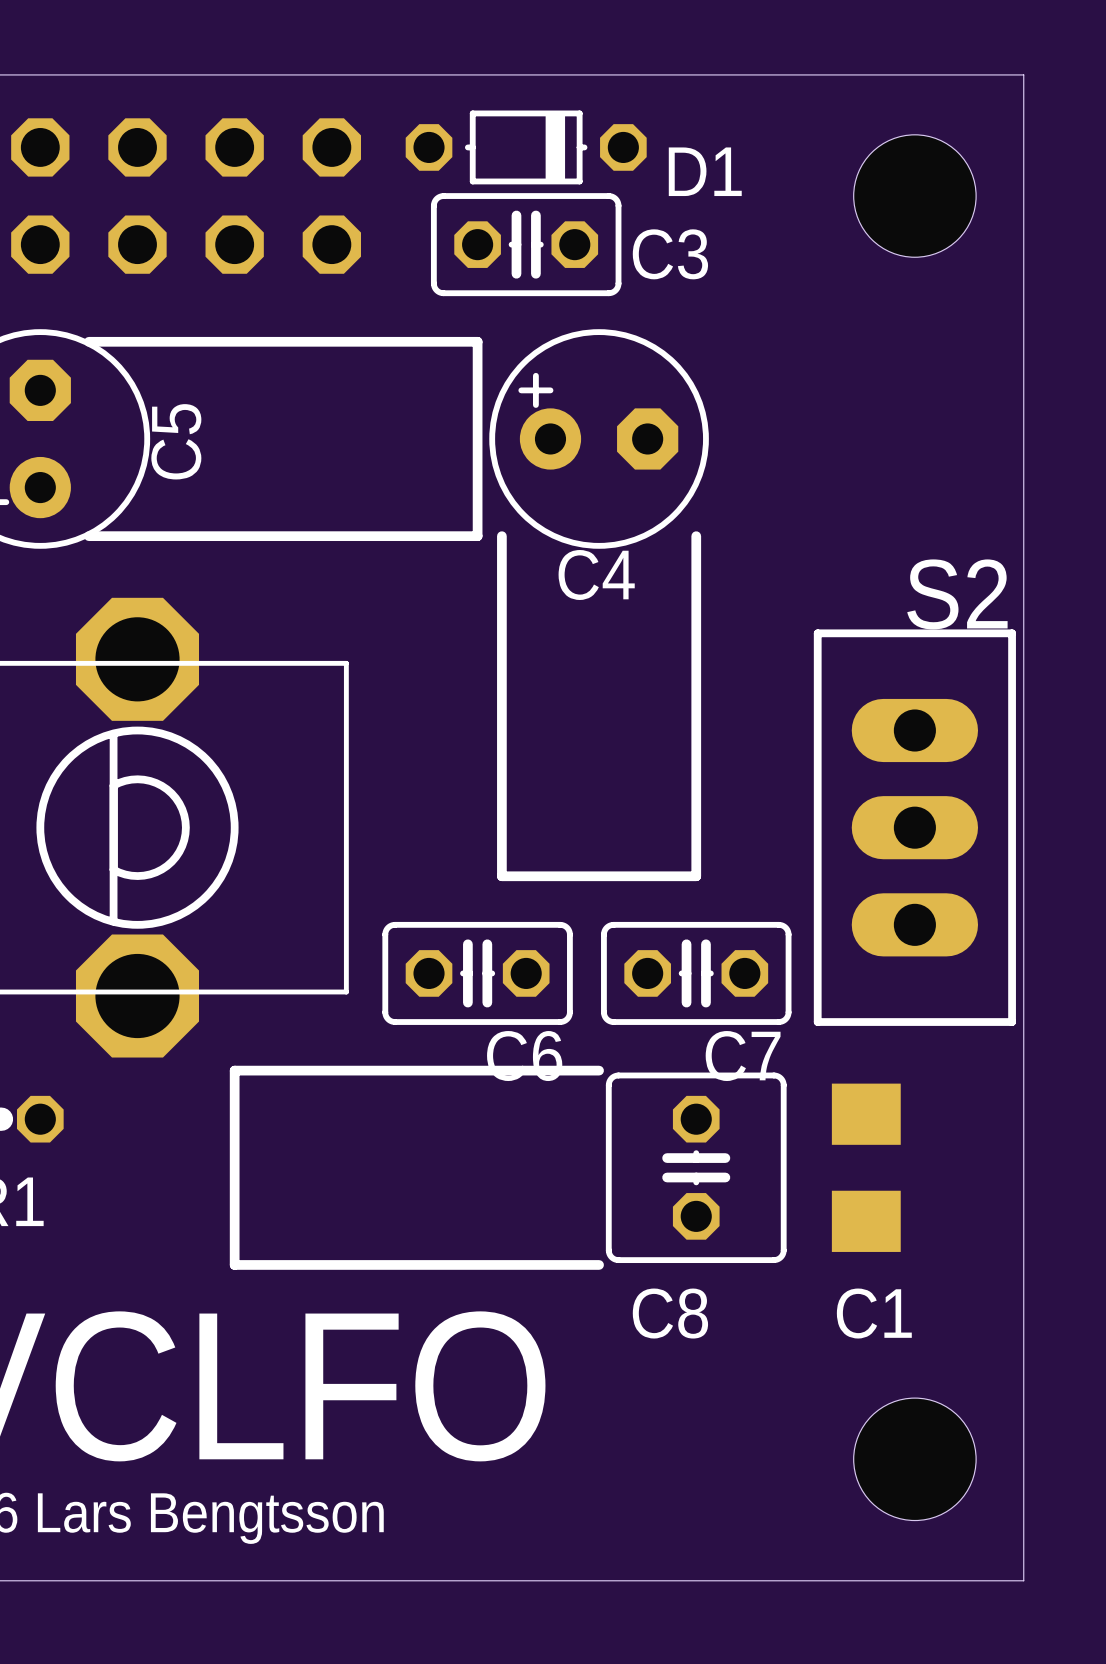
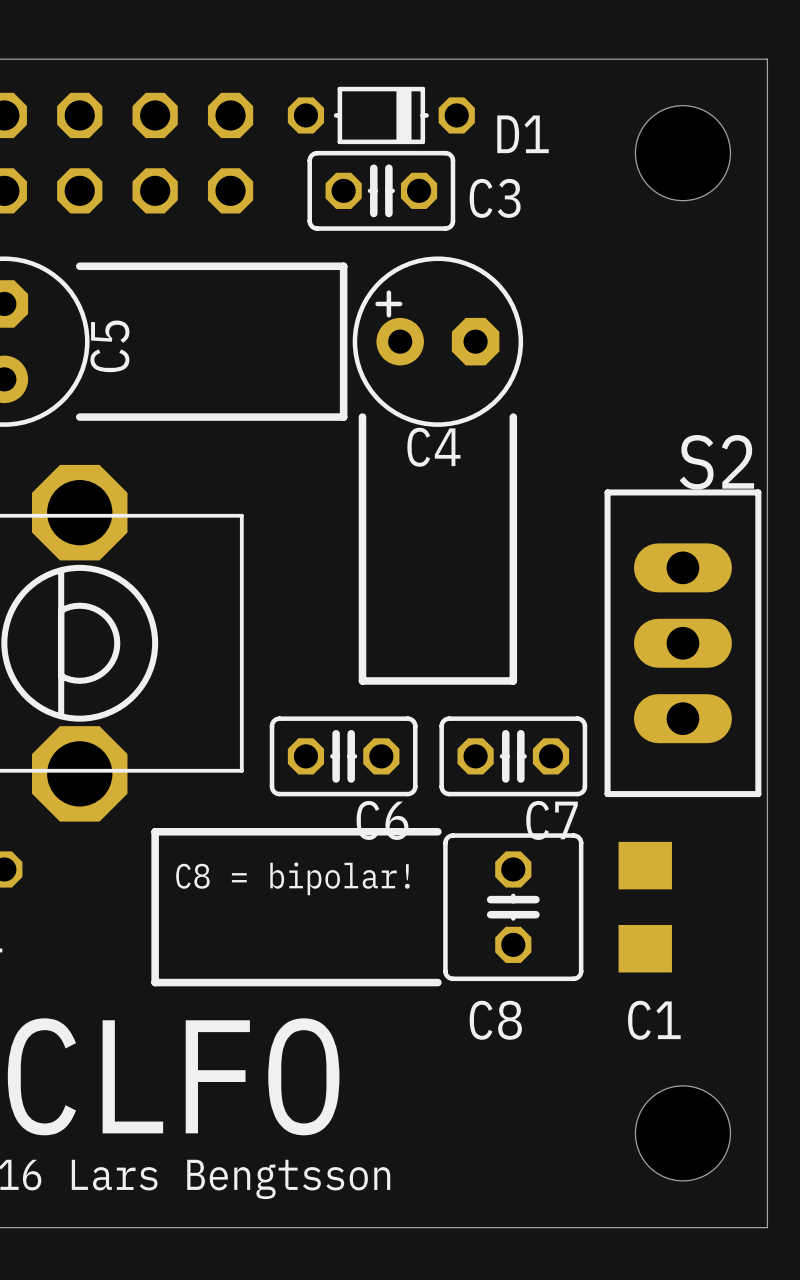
line: (88, 341) (137, 341) -> none
line: (88, 536) (137, 536) -> none
text: none -> C8 = bipolar! (292, 878)

